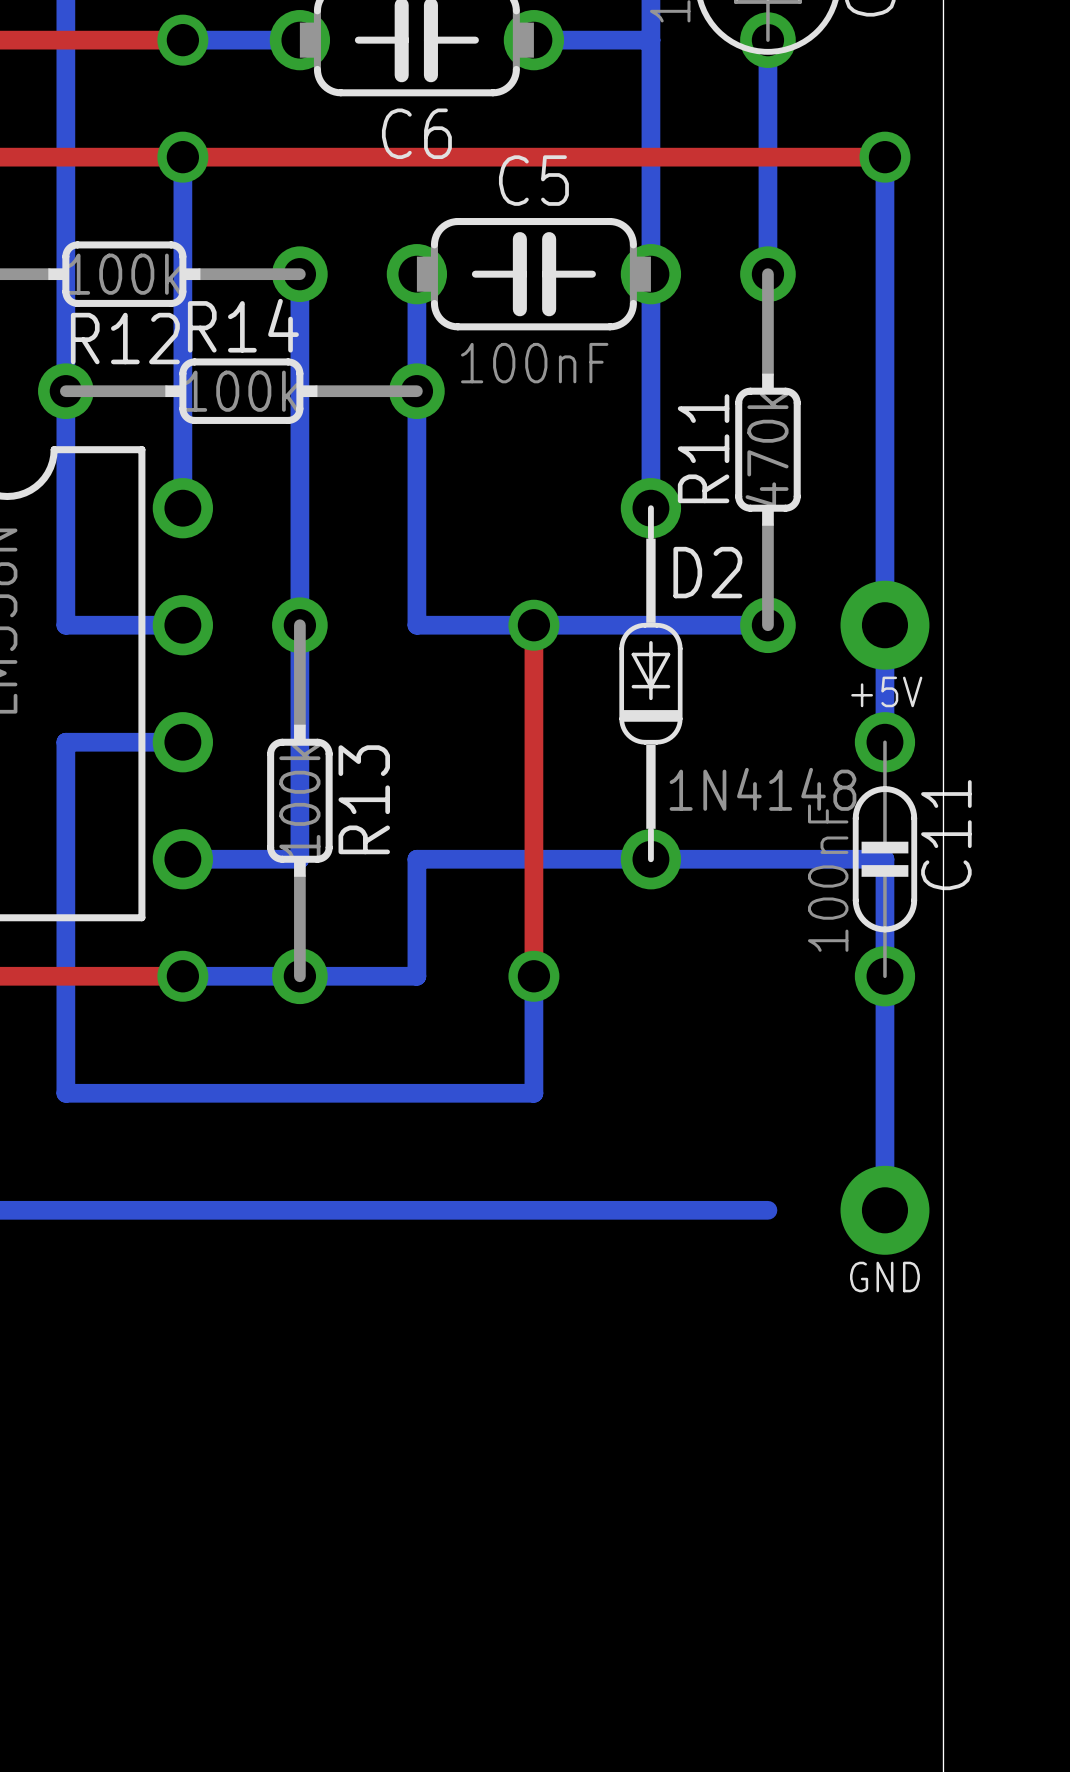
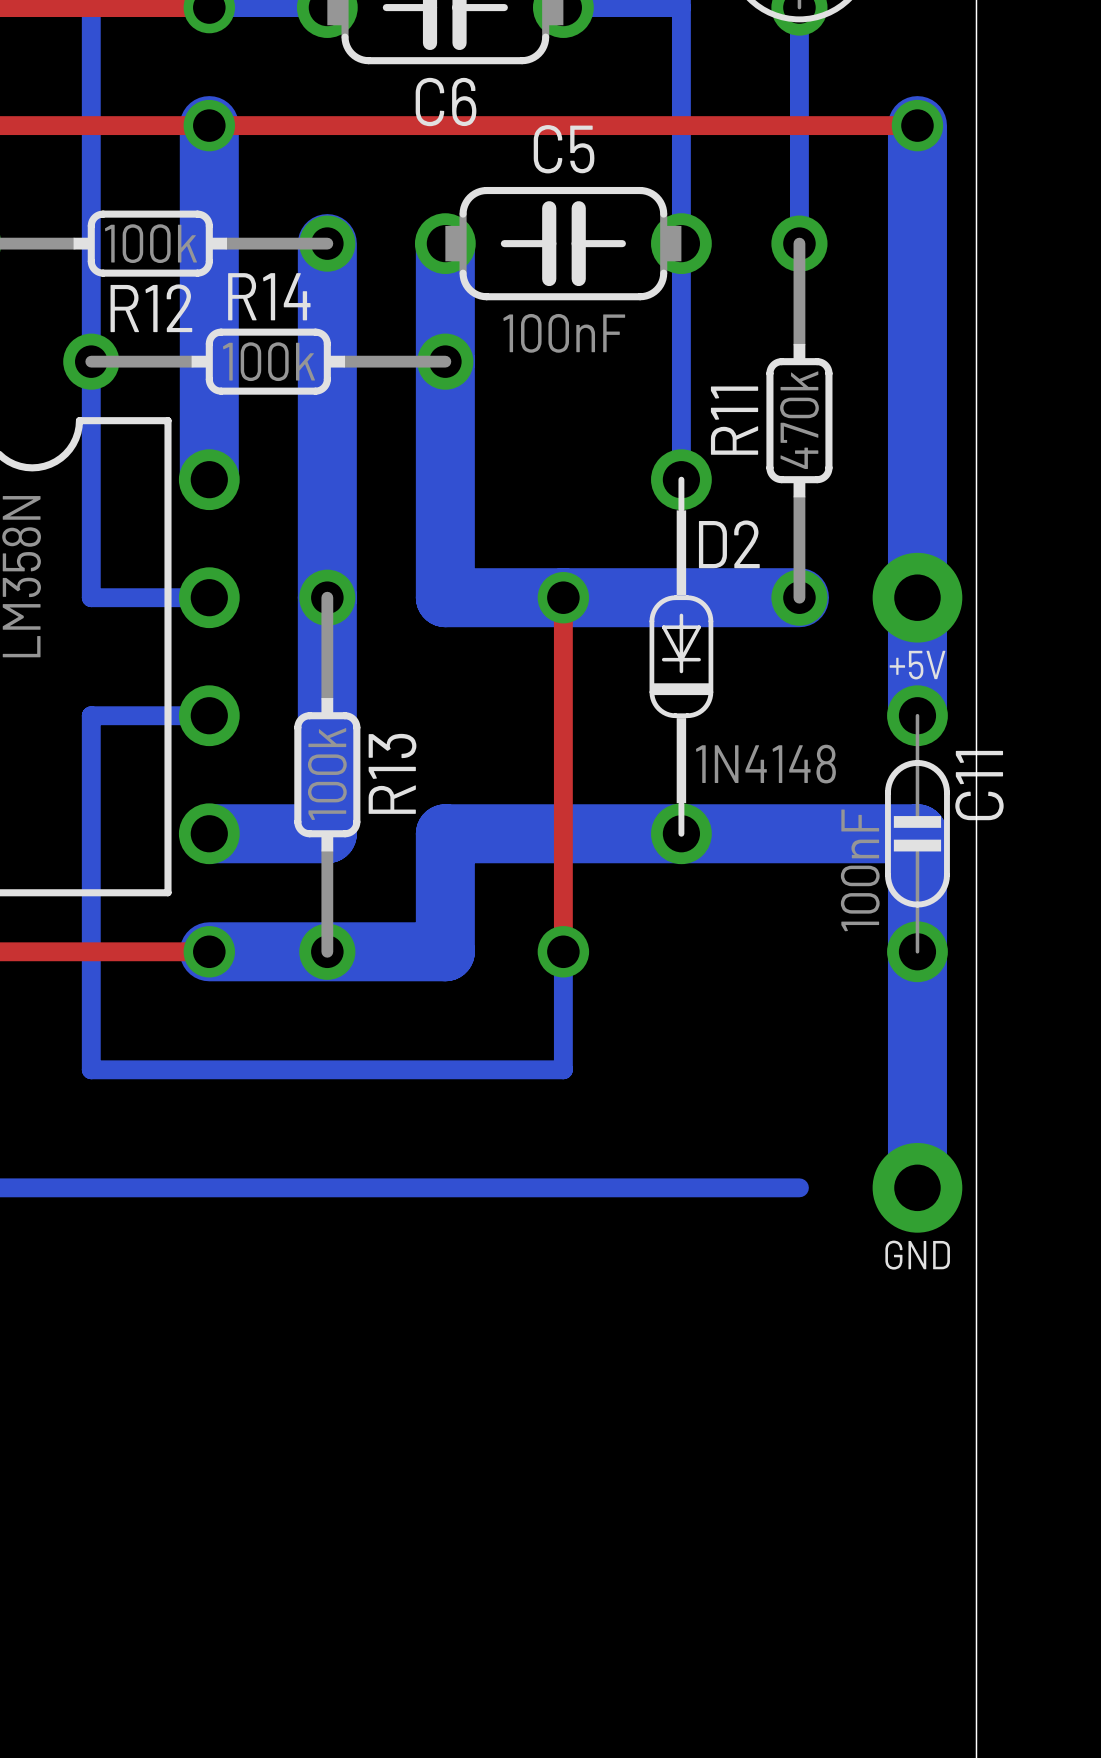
bottom track width: thin (182, 157) (182, 508) -> thick (209, 125) (209, 479)
bottom track width: thin (884, 157) (884, 742) -> thick (917, 125) (917, 715)
bottom track width: thin (299, 274) (299, 859) (182, 859) -> thick (327, 243) (327, 833) (209, 833)
bottom track width: thin (416, 274) (416, 625) (767, 625) -> thick (445, 243) (445, 597) (799, 597)
bottom track width: thin (182, 976) (416, 976) (416, 859) (884, 859) (884, 1210) -> thick (209, 951) (445, 951) (445, 833) (917, 833) (917, 1187)

